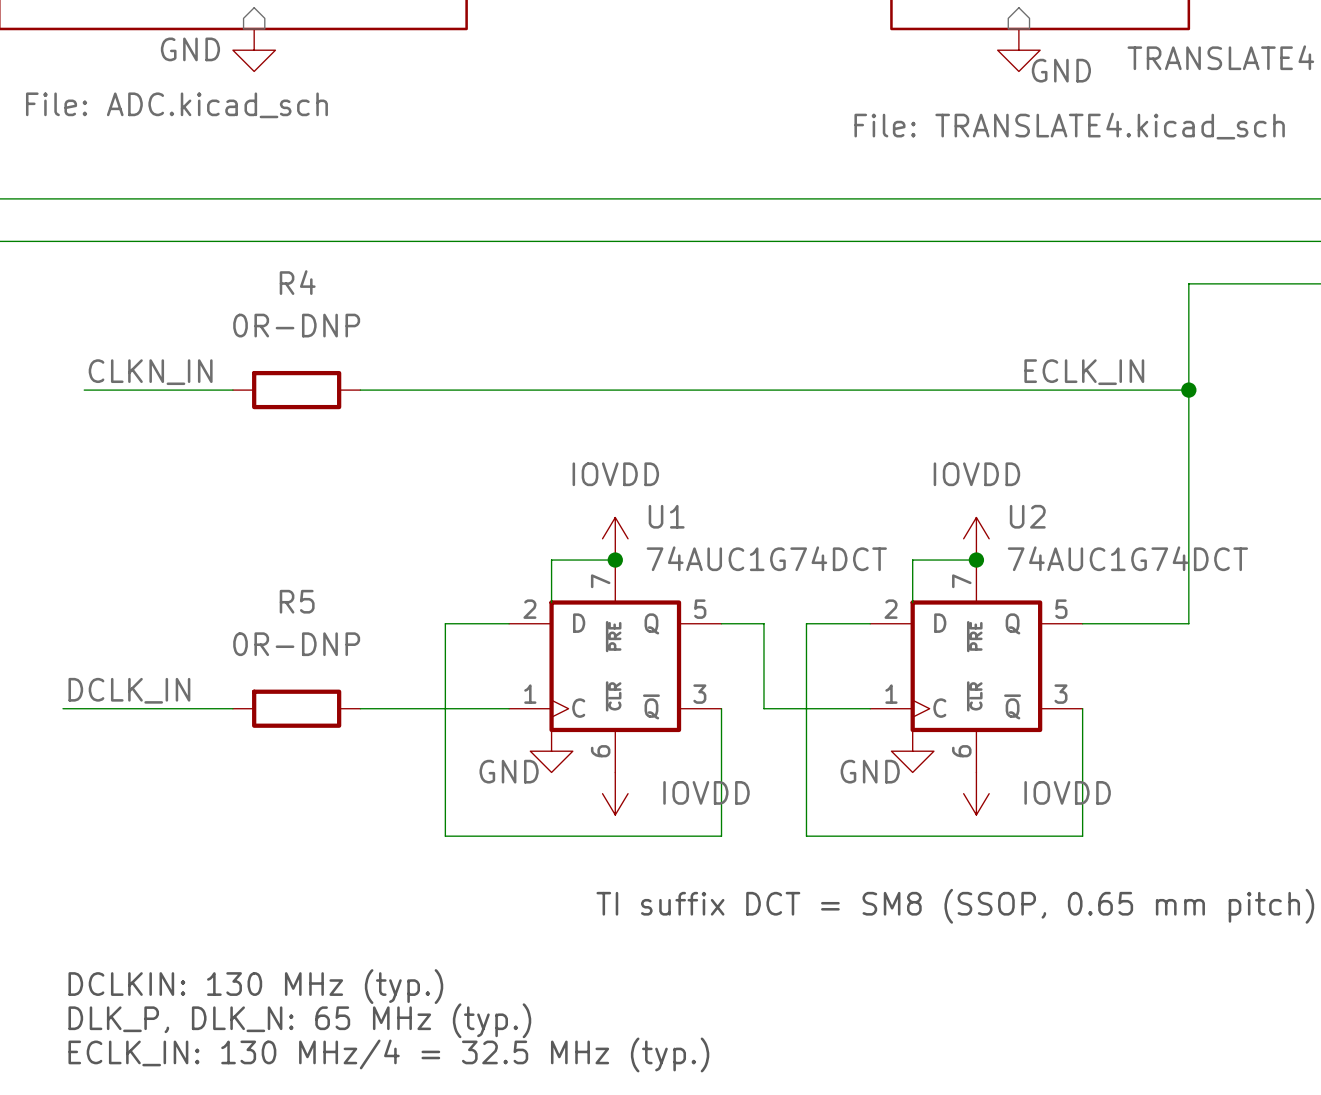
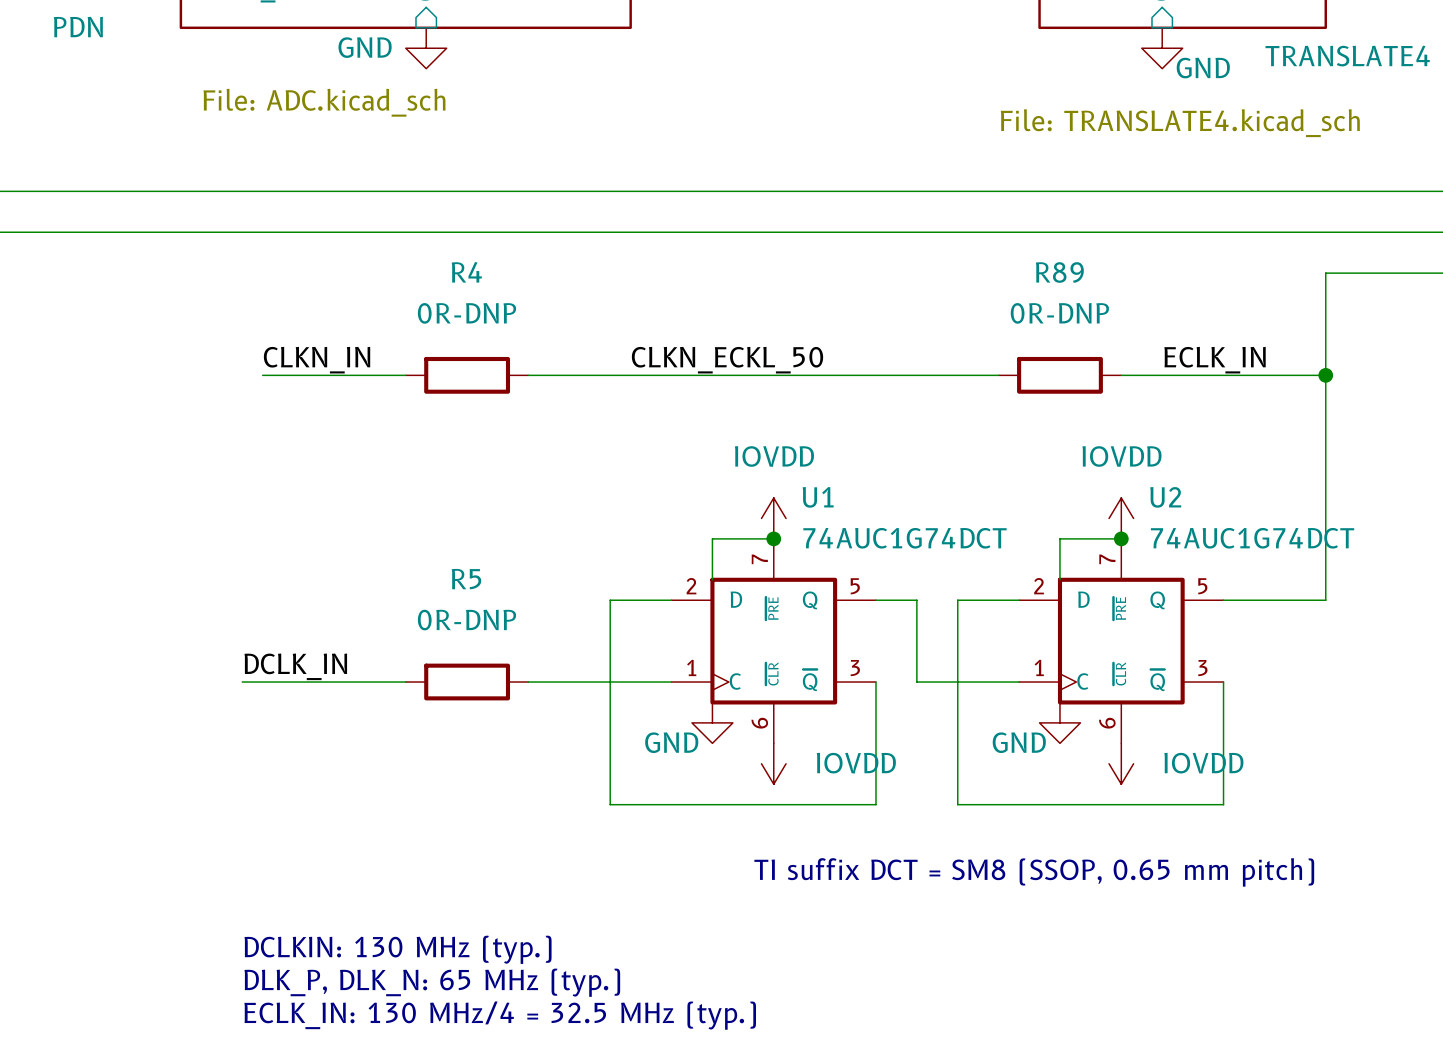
label: none -> CLKN_ECKL_50 (727, 360)
wire: (848, 390) (976, 390) -> none
R89: none -> 0R-DNP (1059, 375)

